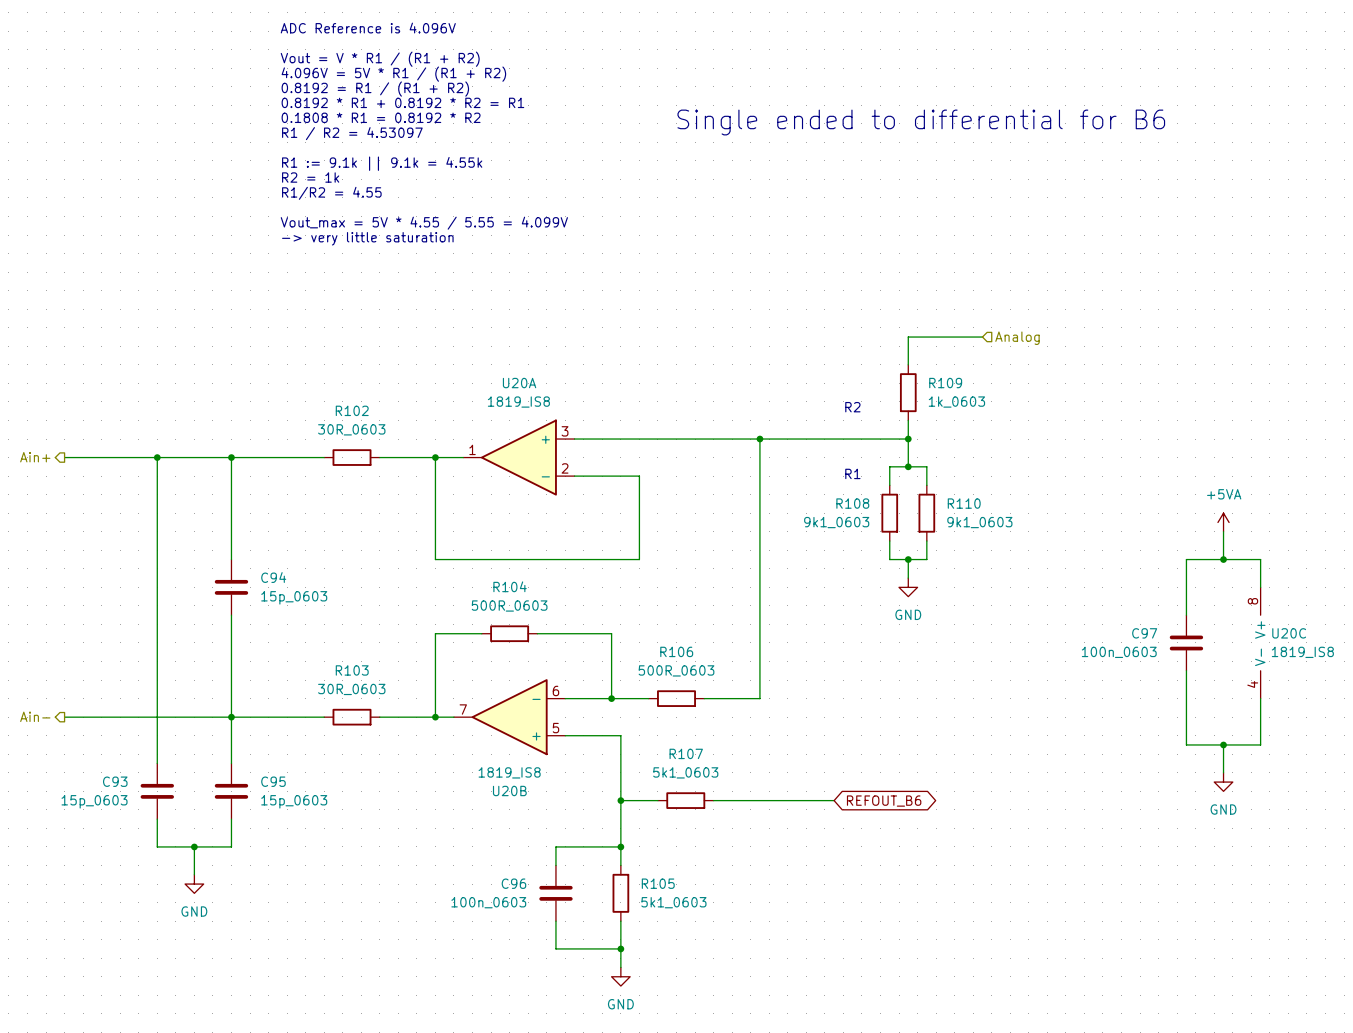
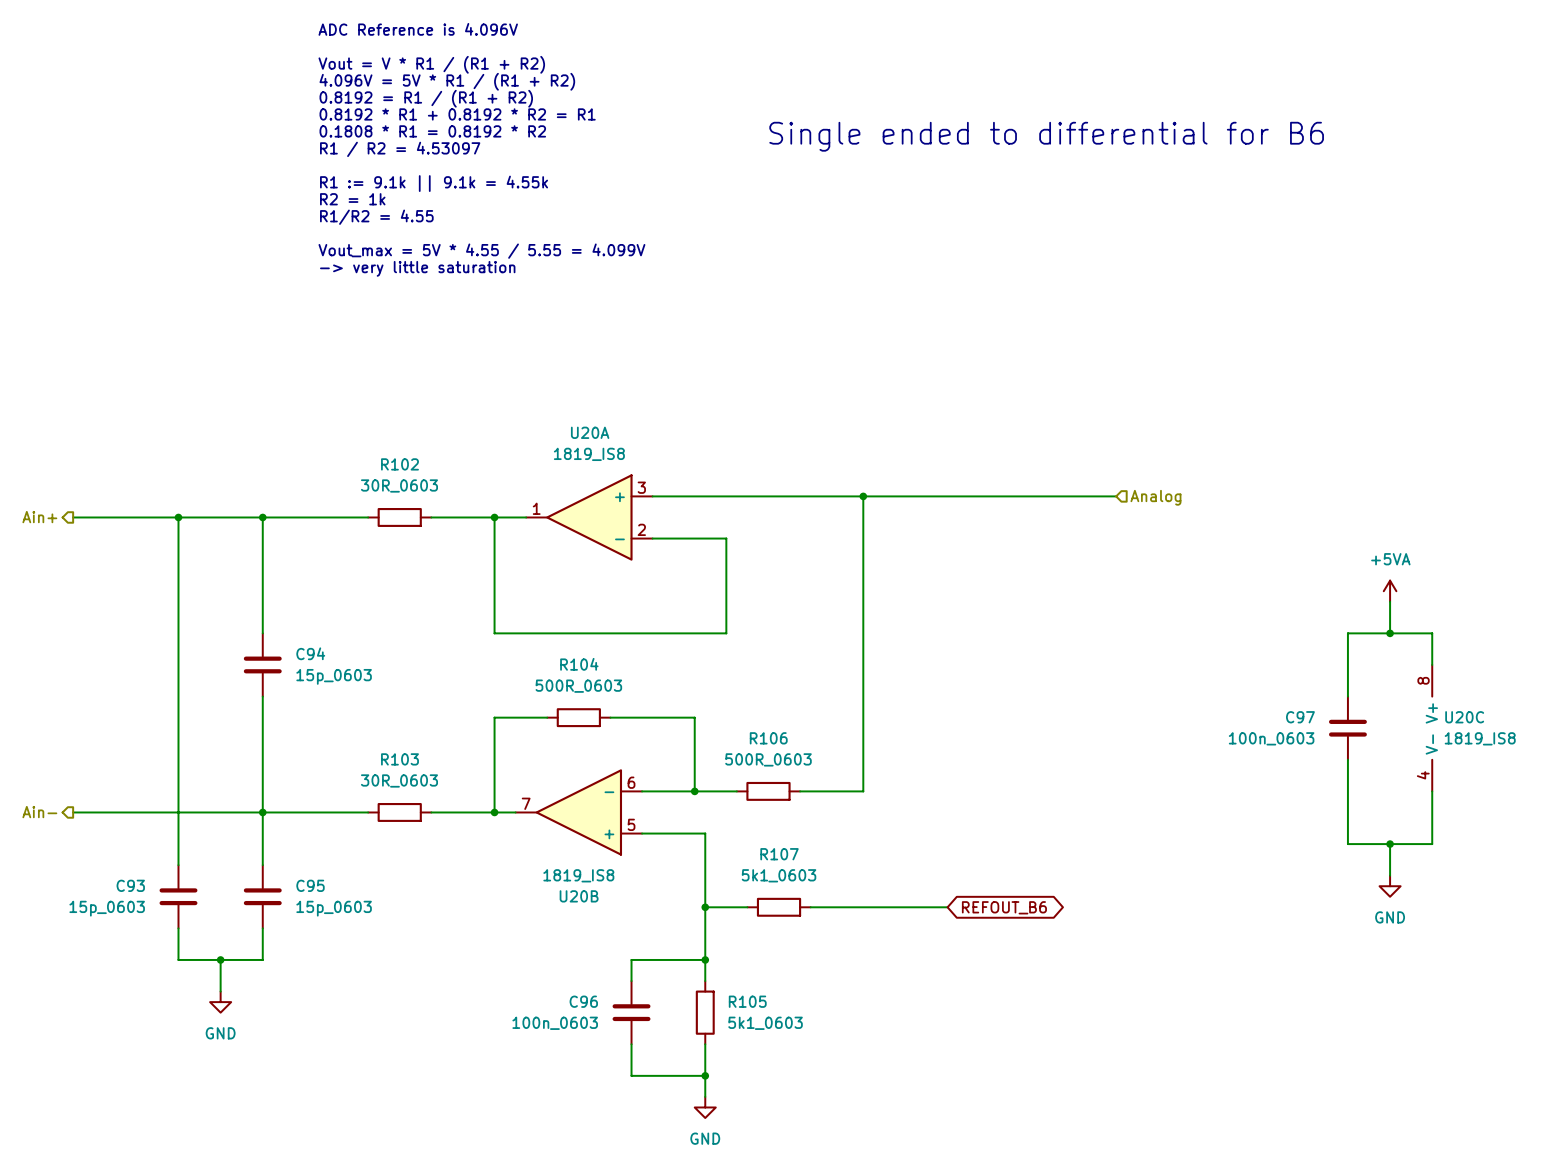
wire: (982, 337) (908, 337) (908, 364) -> none
hierarchical label position: Analog (1017, 338) -> Analog (1155, 497)
R109: 1k_0603 (908, 392) -> none
text: R2 (852, 407) -> none
wire: (908, 420) (908, 466) -> none
wire: none -> (1031, 496) (1116, 496)
junction: (908, 439) -> none
junction: (908, 466) -> none
text: R1 (852, 473) -> none
wire: (889, 485) (889, 466) (926, 466) (926, 485) -> none
R108: 9k1_0603 (889, 513) -> none
R110: 9k1_0603 (926, 513) -> none
wire: (889, 541) (889, 559) (926, 559) (926, 541) -> none
wire: (908, 559) (908, 578) -> none
junction: (908, 559) -> none
power symbol: GND (908, 587) -> none

